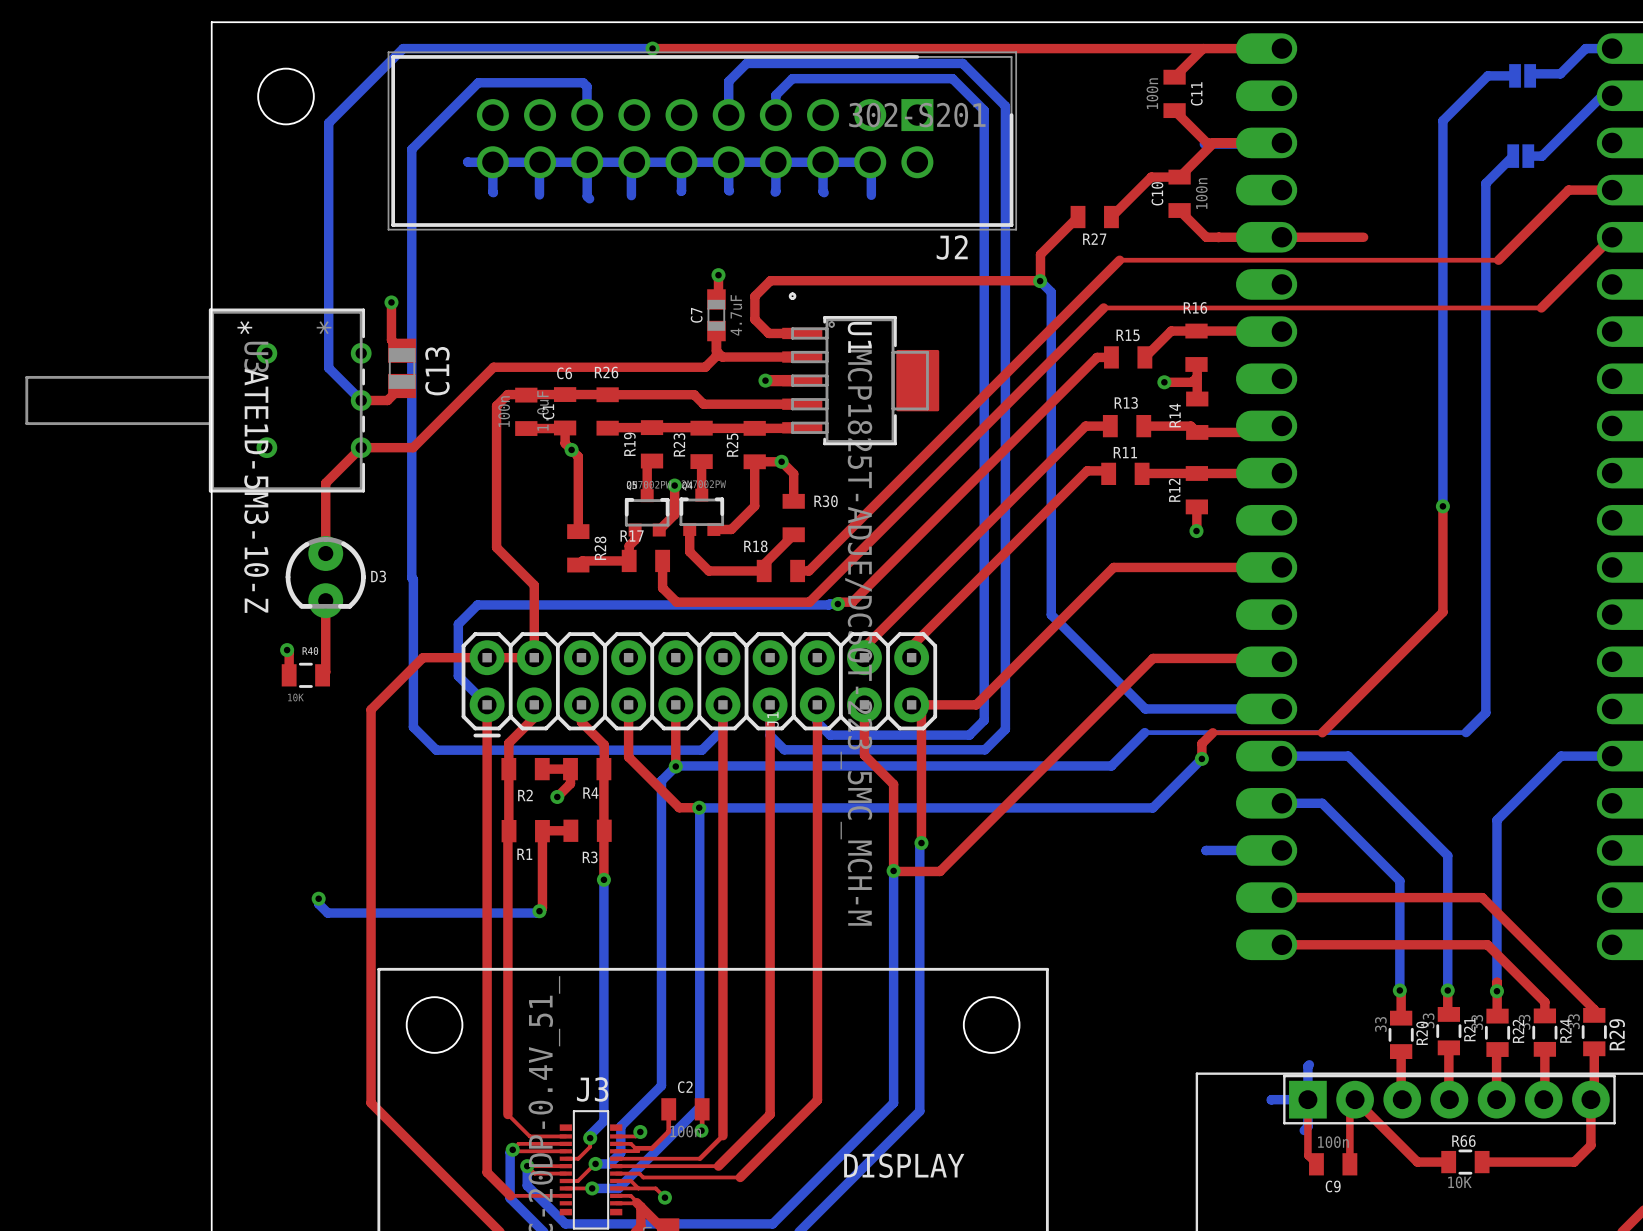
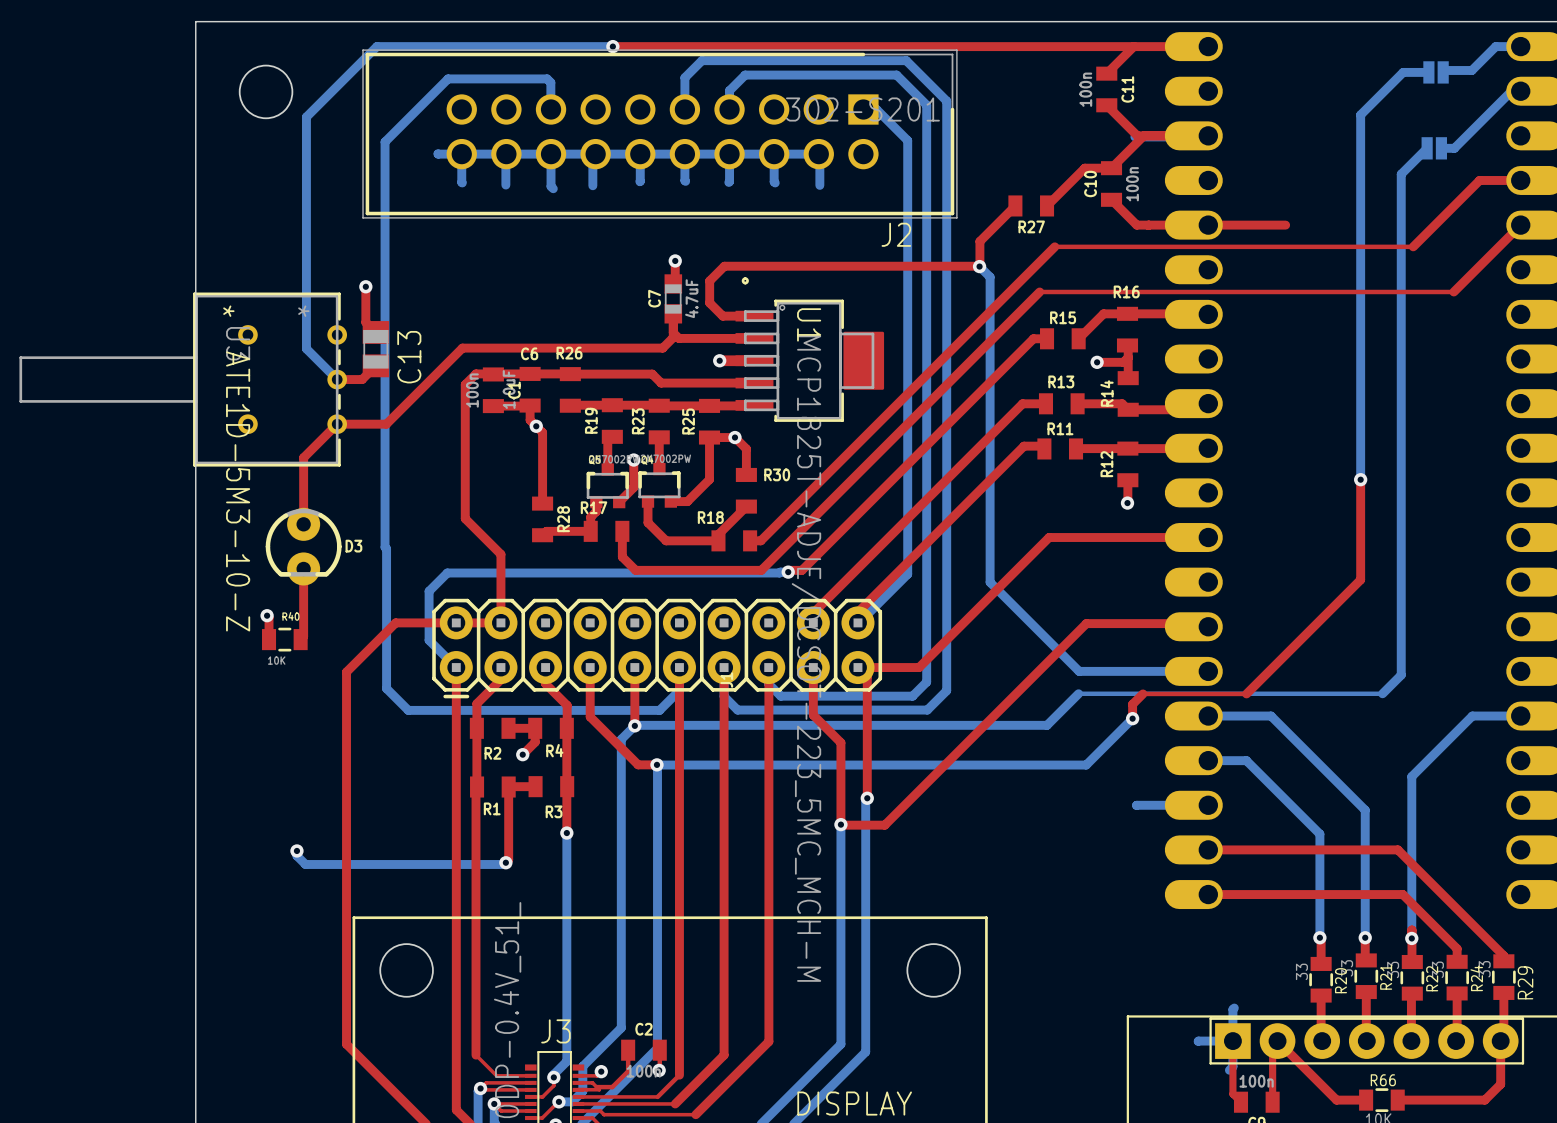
bottom track: none -> (863, 109) (876, 109) (907, 140) (907, 574) (857, 622)

